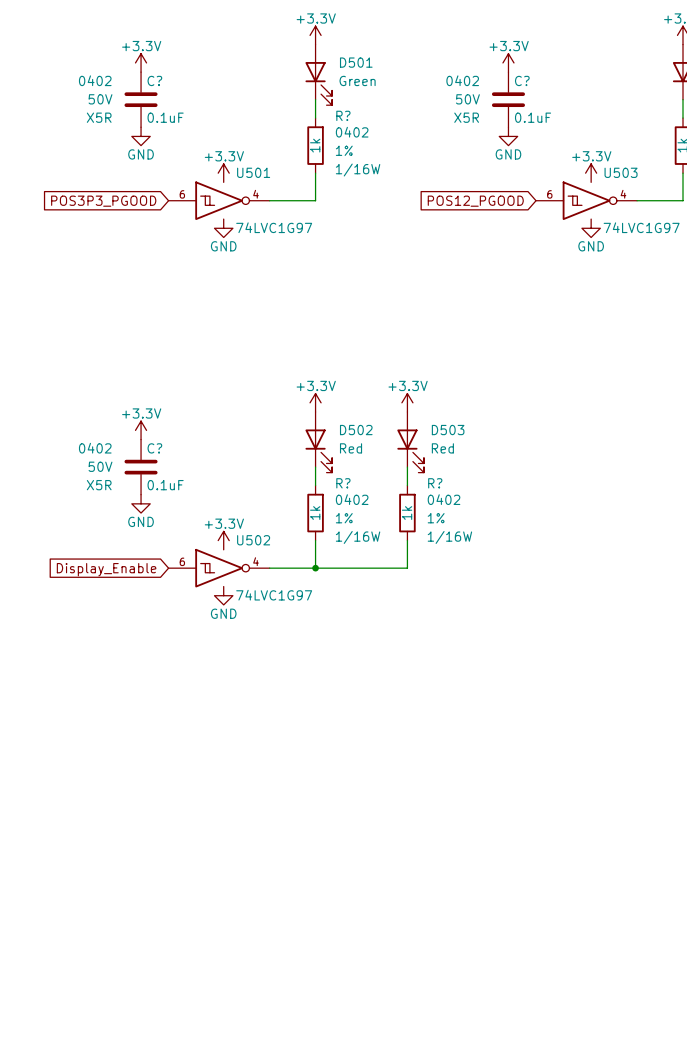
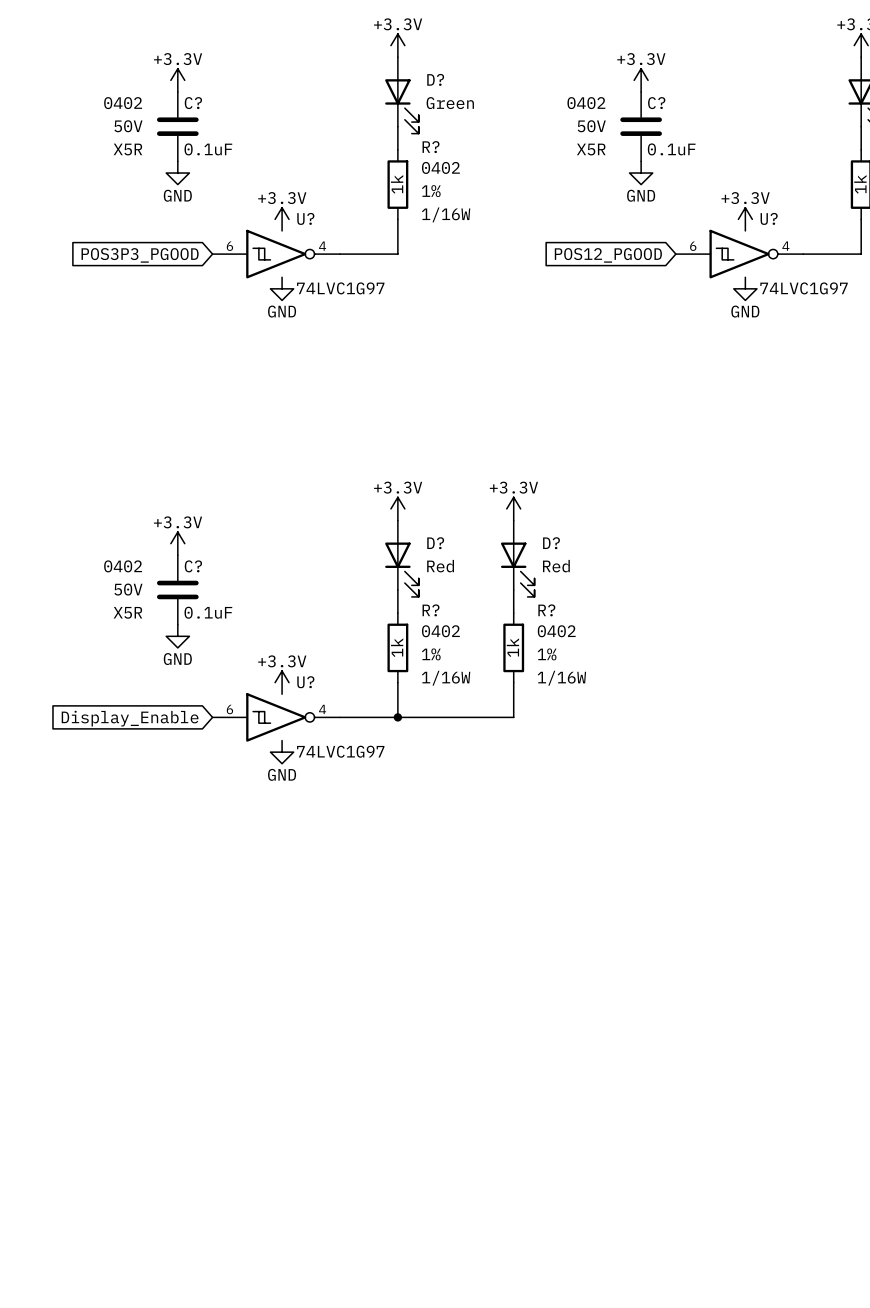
D501 name: D501 (356, 62) -> D? (435, 79)
U501 name: U501 (253, 172) -> U? (305, 218)
U503 name: U503 (621, 172) -> U? (769, 218)
D502 name: D502 (356, 430) -> D? (435, 543)
D503 name: D503 (448, 430) -> D? (551, 543)
U502 name: U502 (253, 540) -> U? (305, 682)

